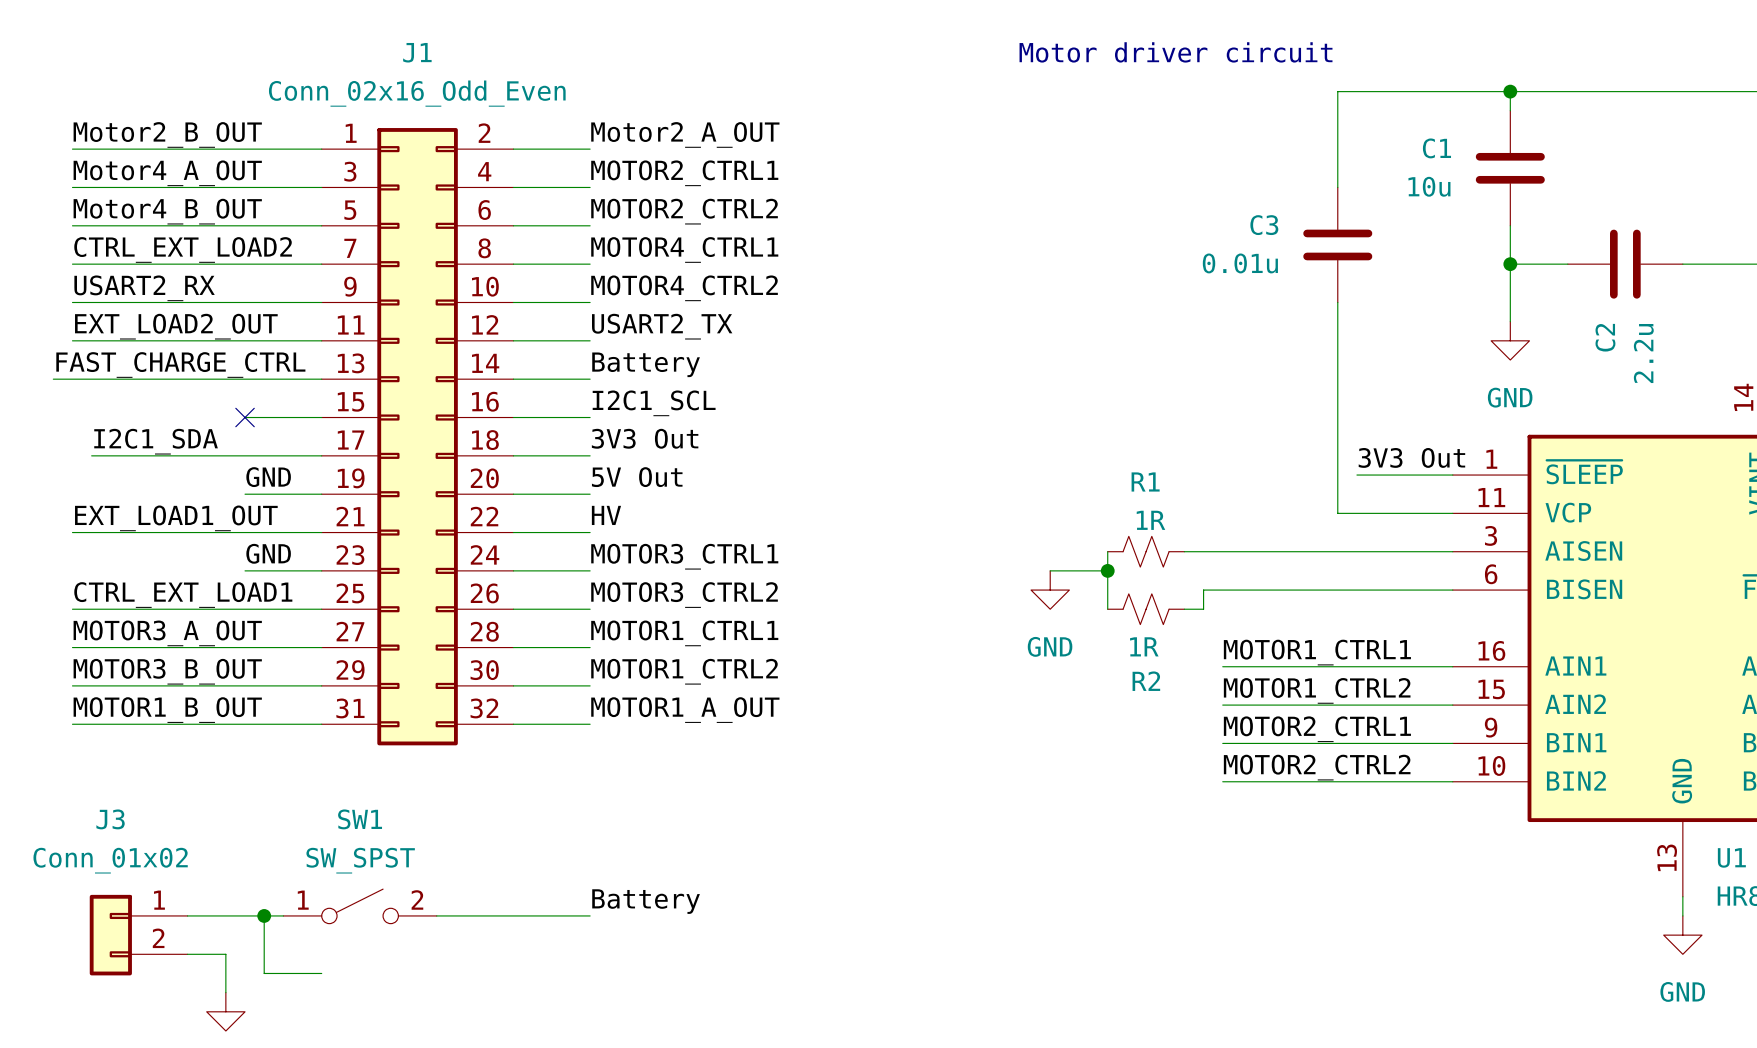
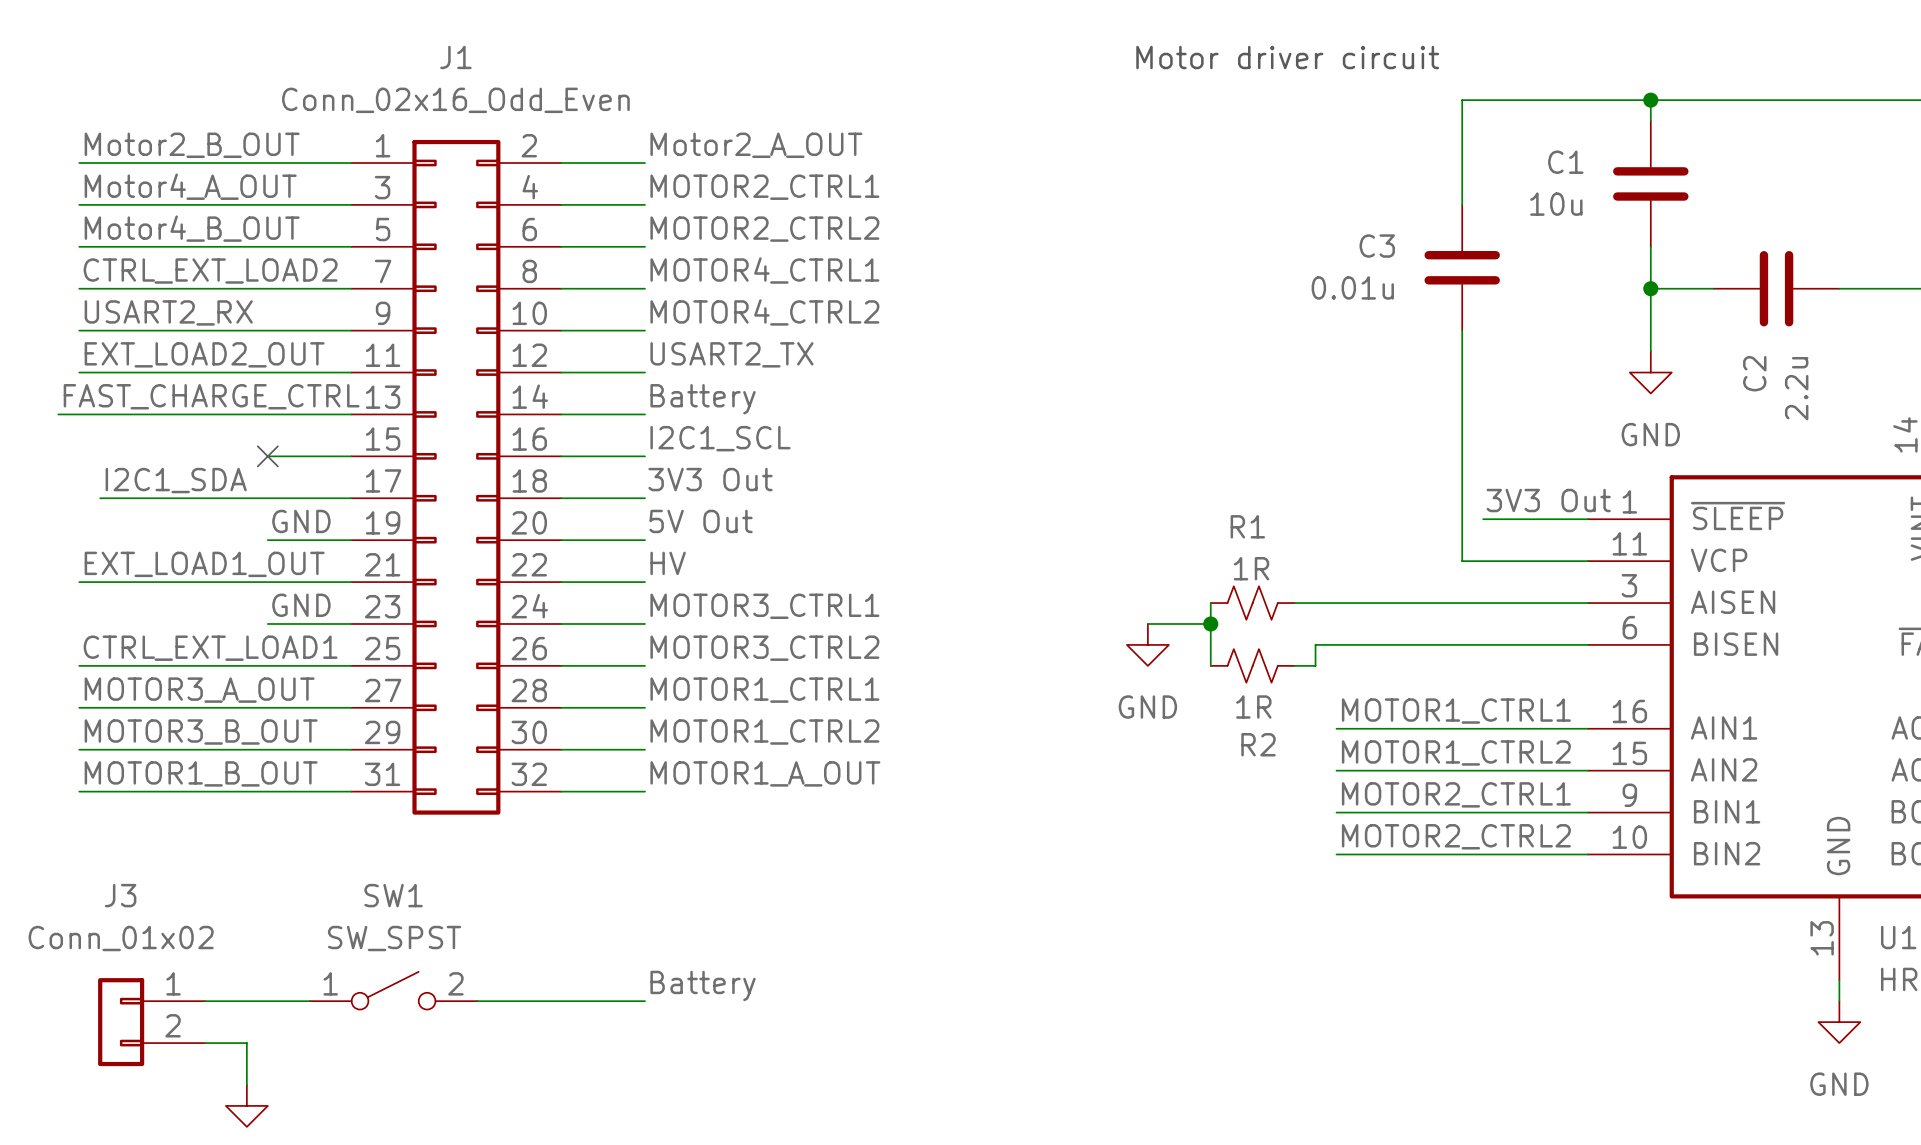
wire: (264, 915) (264, 973) (321, 973) -> none
junction: (264, 915) -> none

